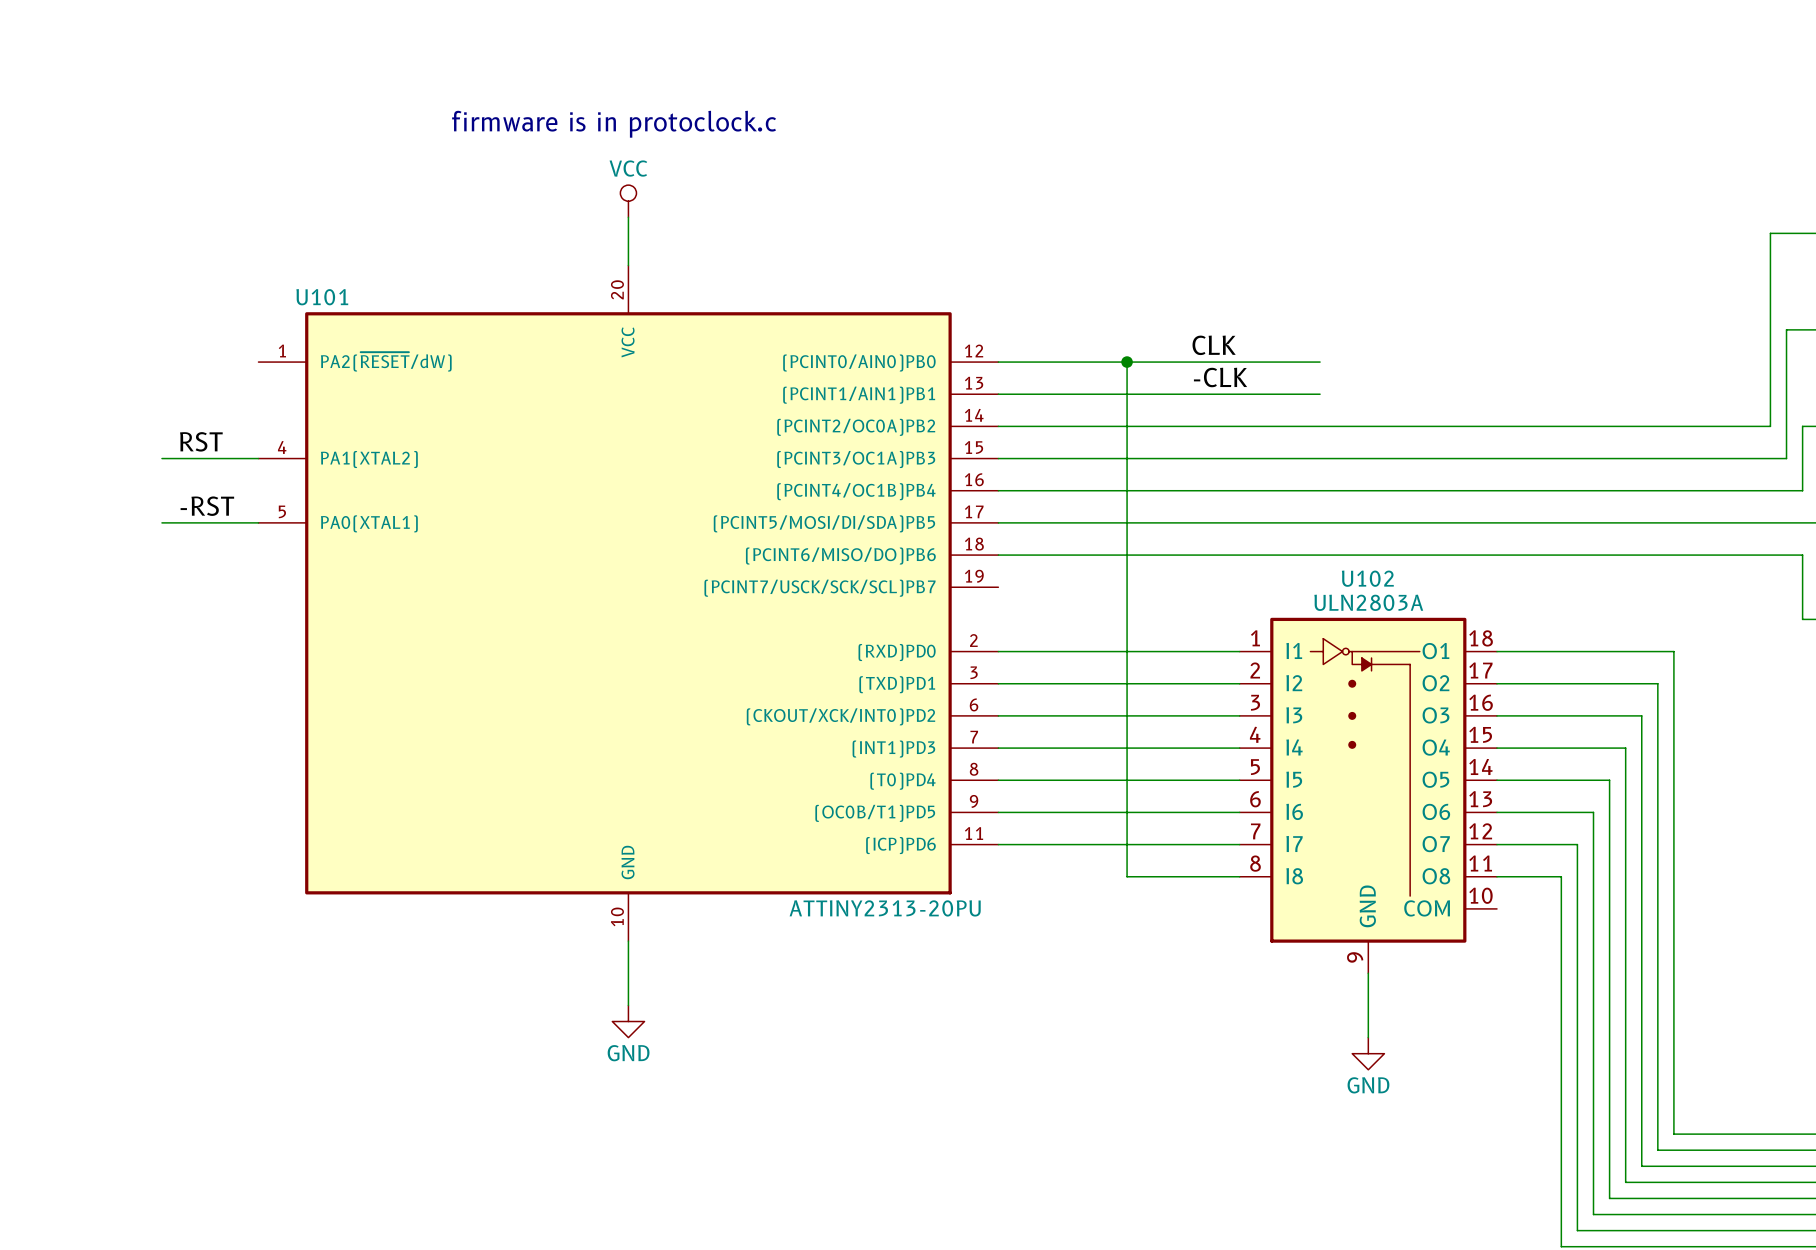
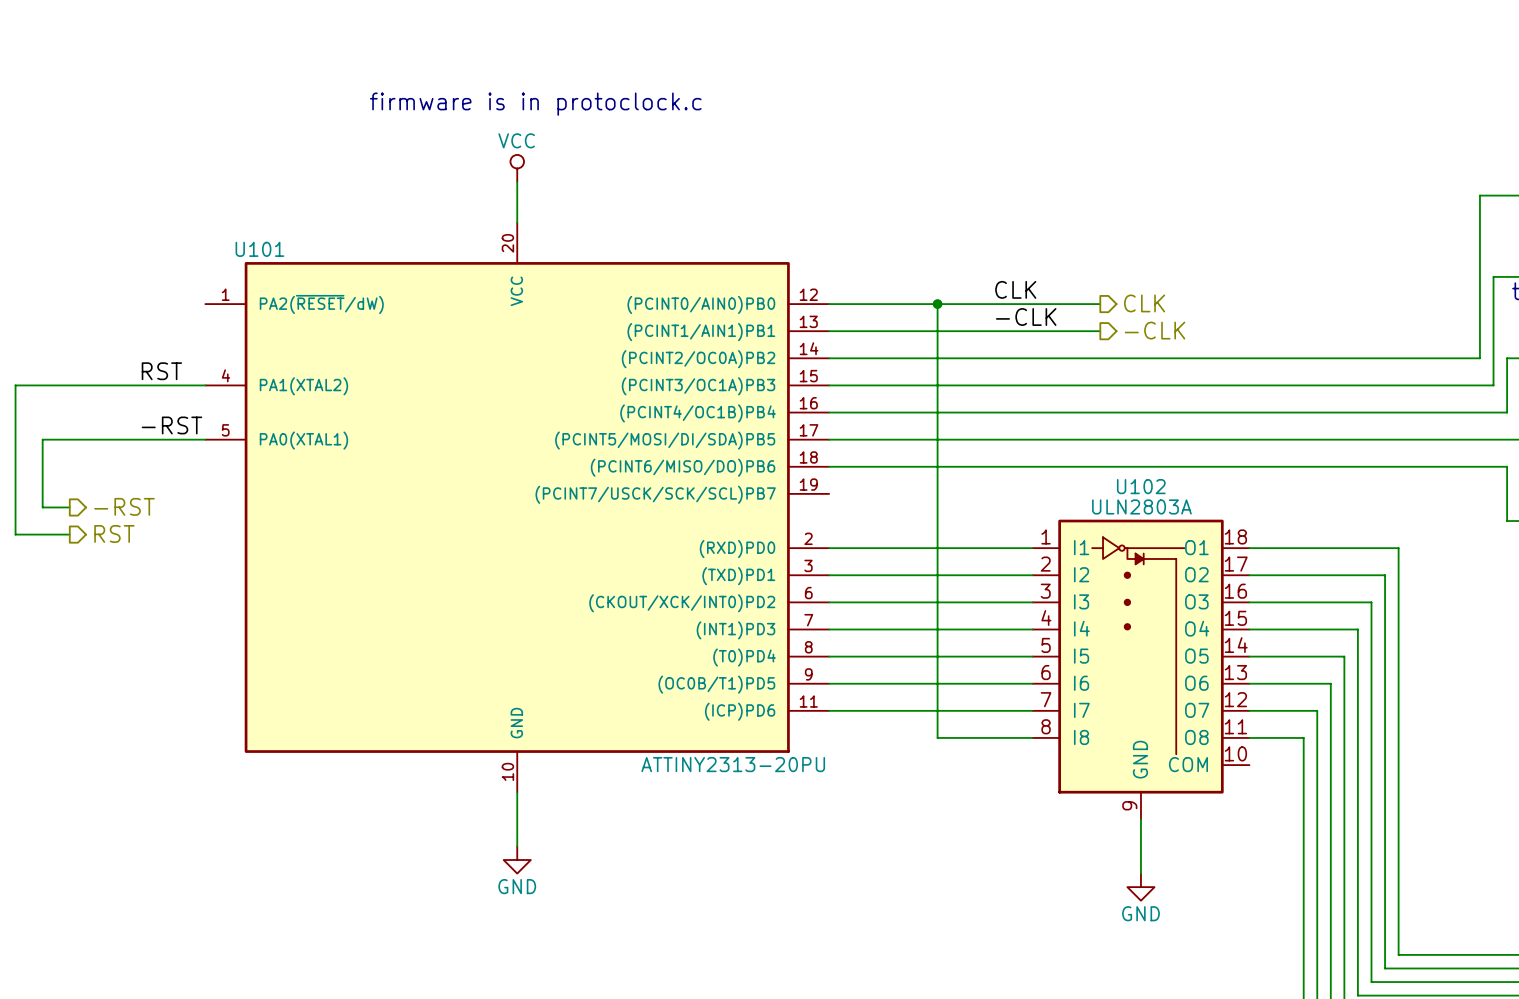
hierarchical label: none -> CLK (1144, 303)
hierarchical label: none -> -CLK (1155, 330)
wire: none -> (124, 385) (15, 385) (15, 534) (69, 534)
wire: none -> (124, 439) (42, 439) (42, 507) (69, 507)
hierarchical label: none -> -RST (124, 506)
hierarchical label: none -> RST (114, 533)

